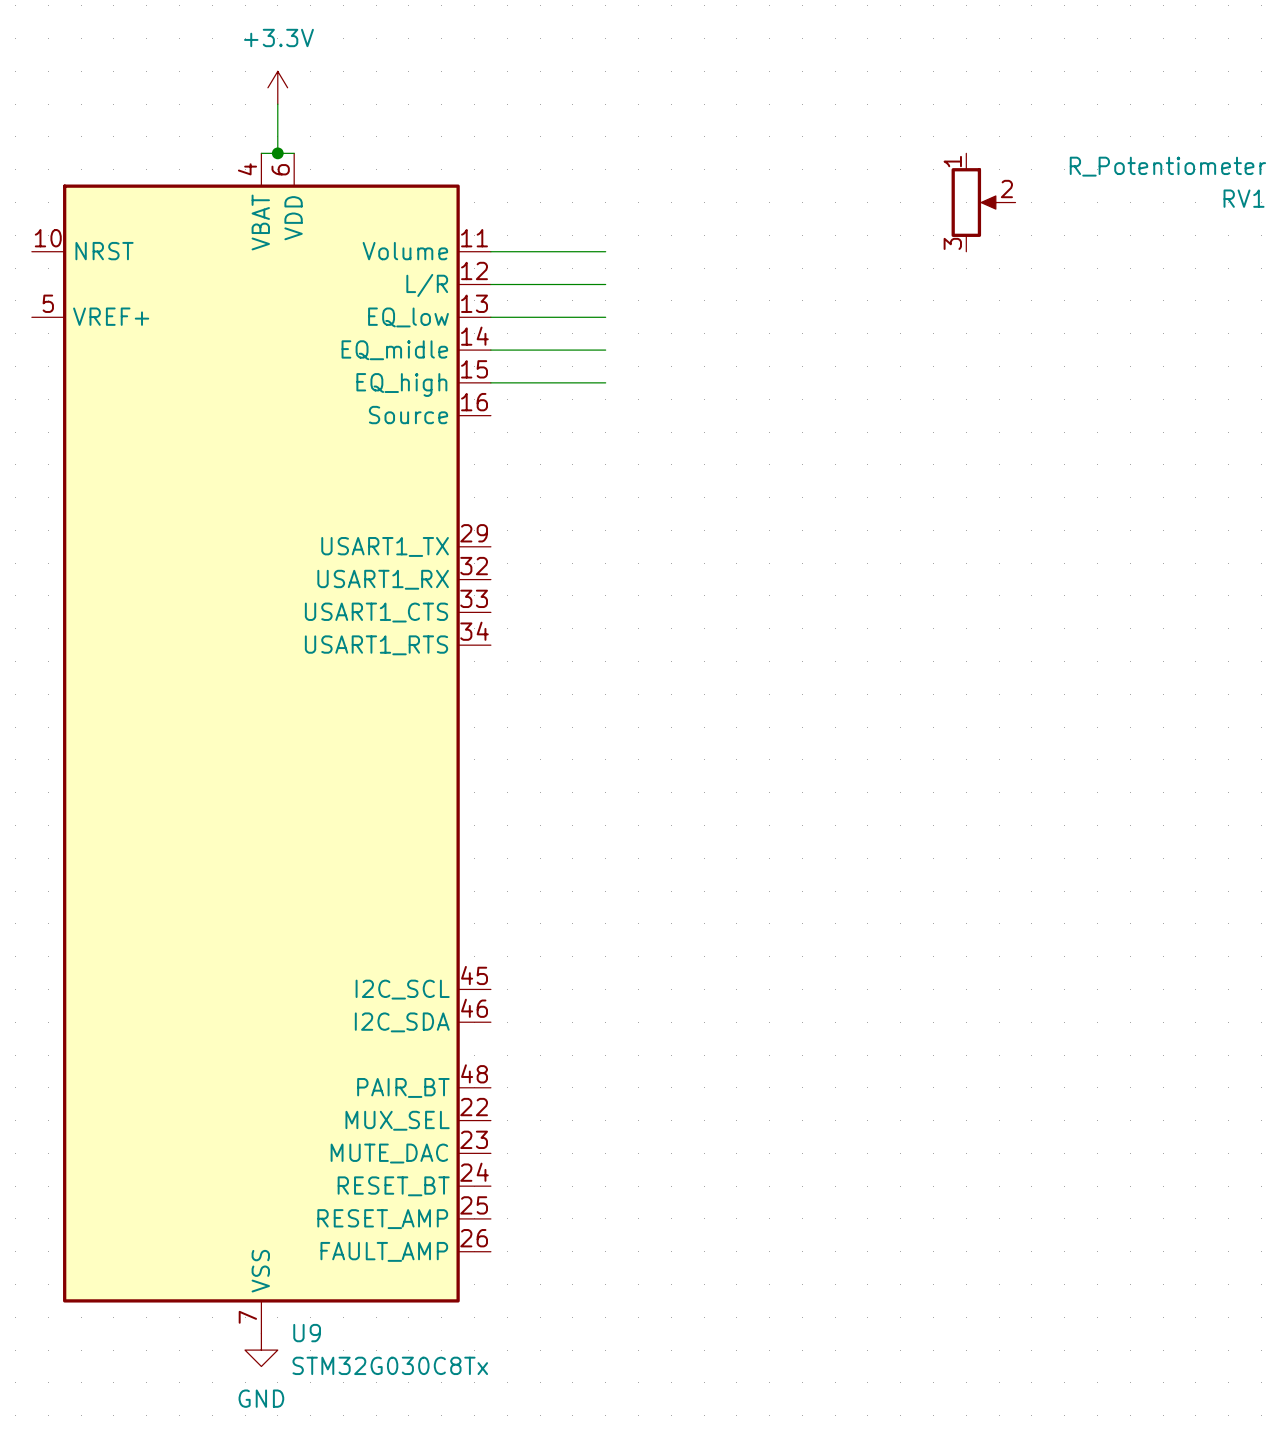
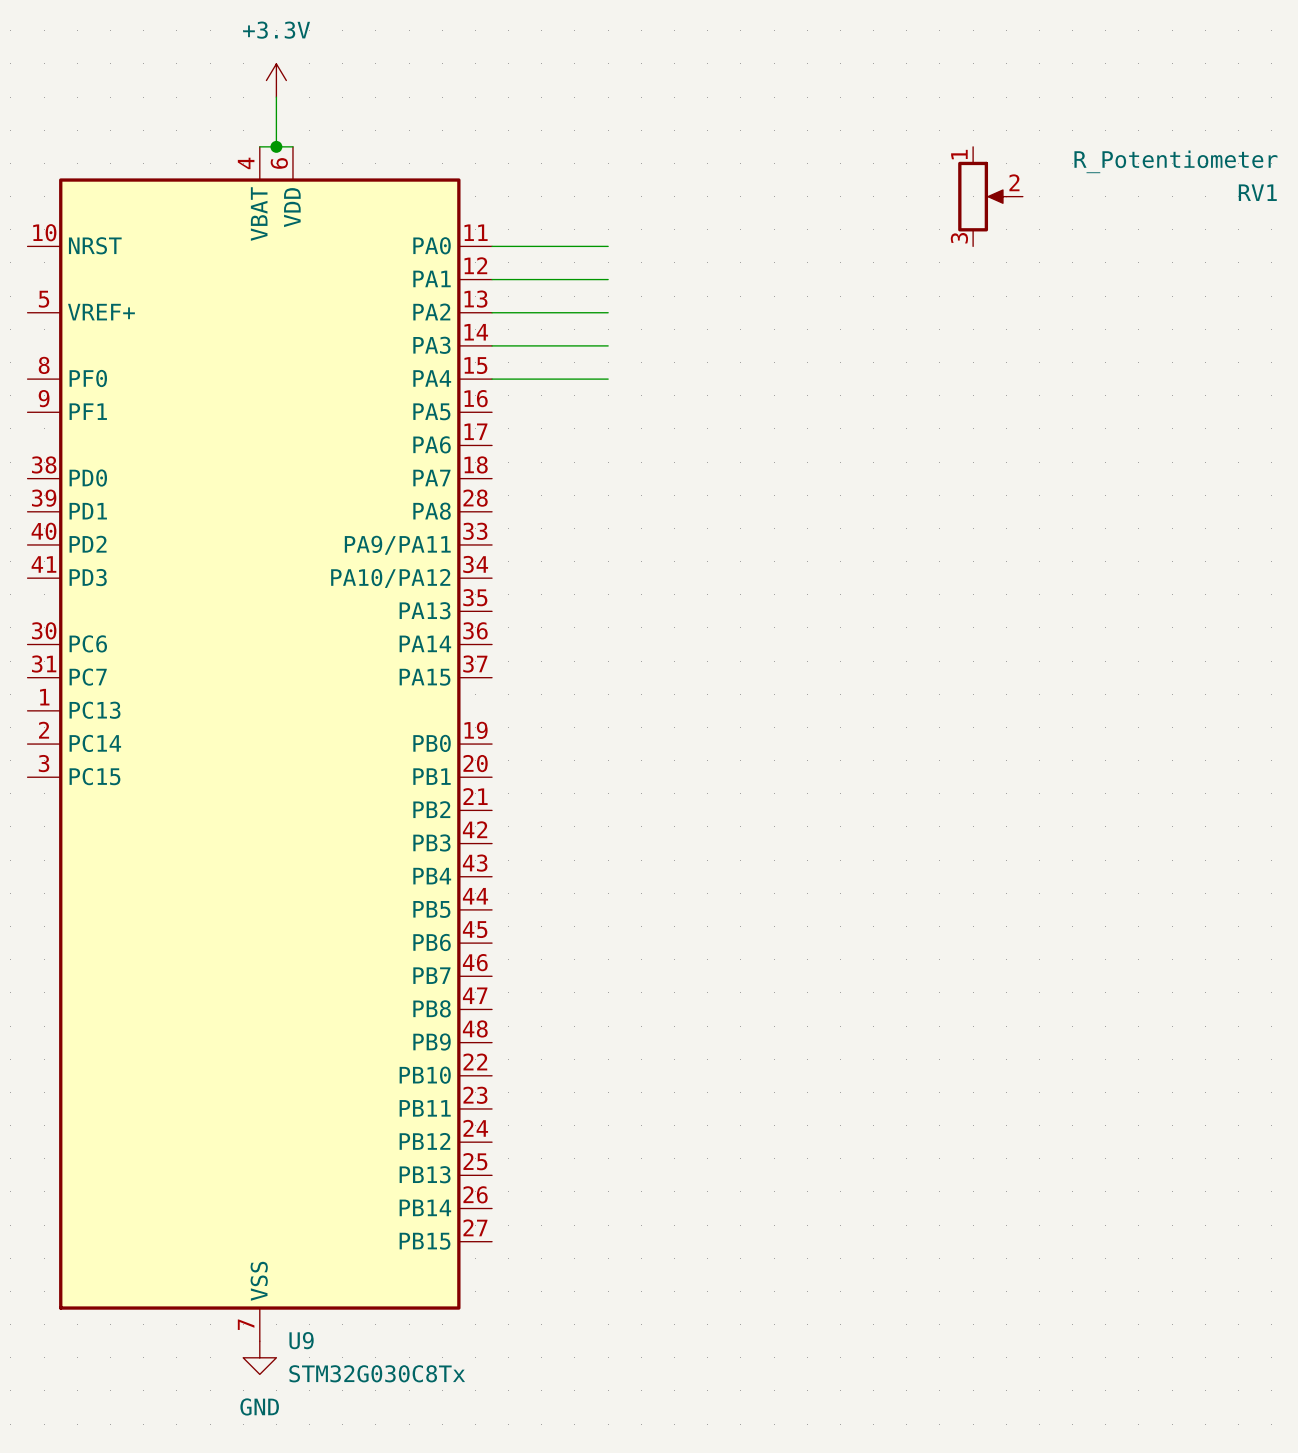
U9 symbol: [31, 153, 491, 1334] -> [27, 146, 493, 1342]

